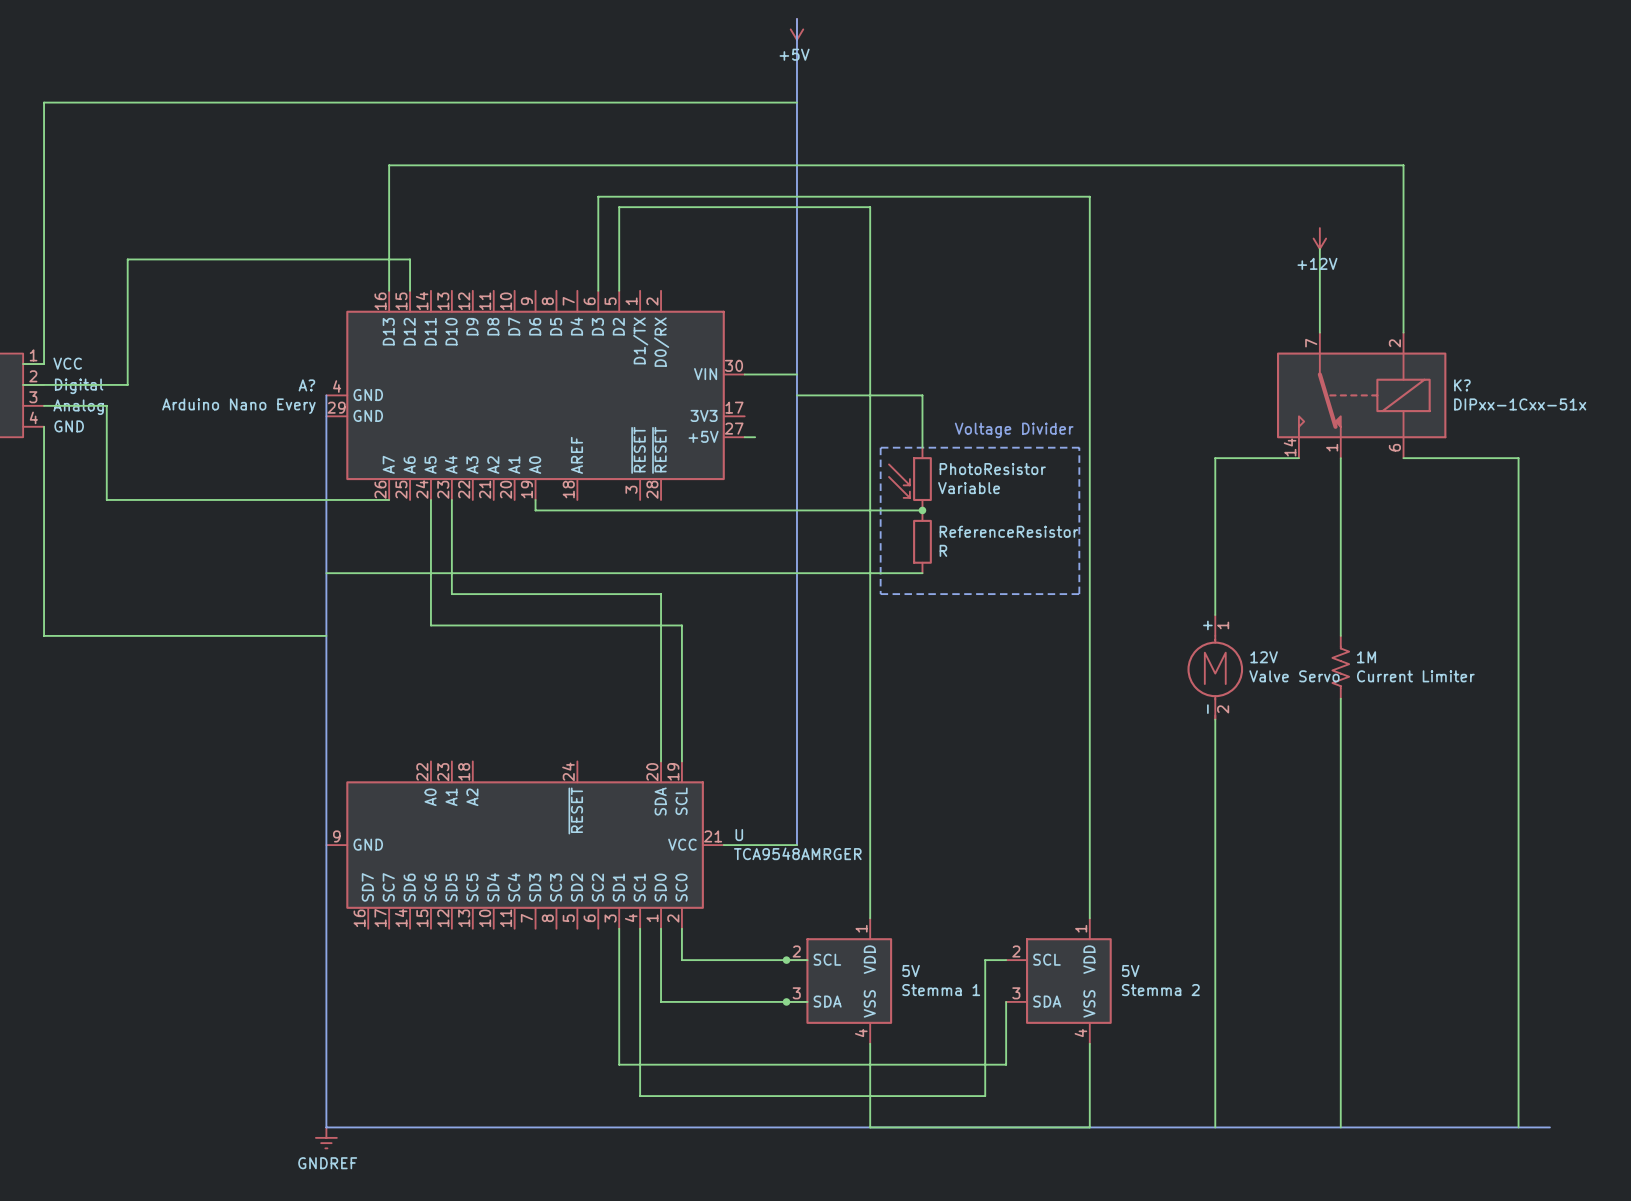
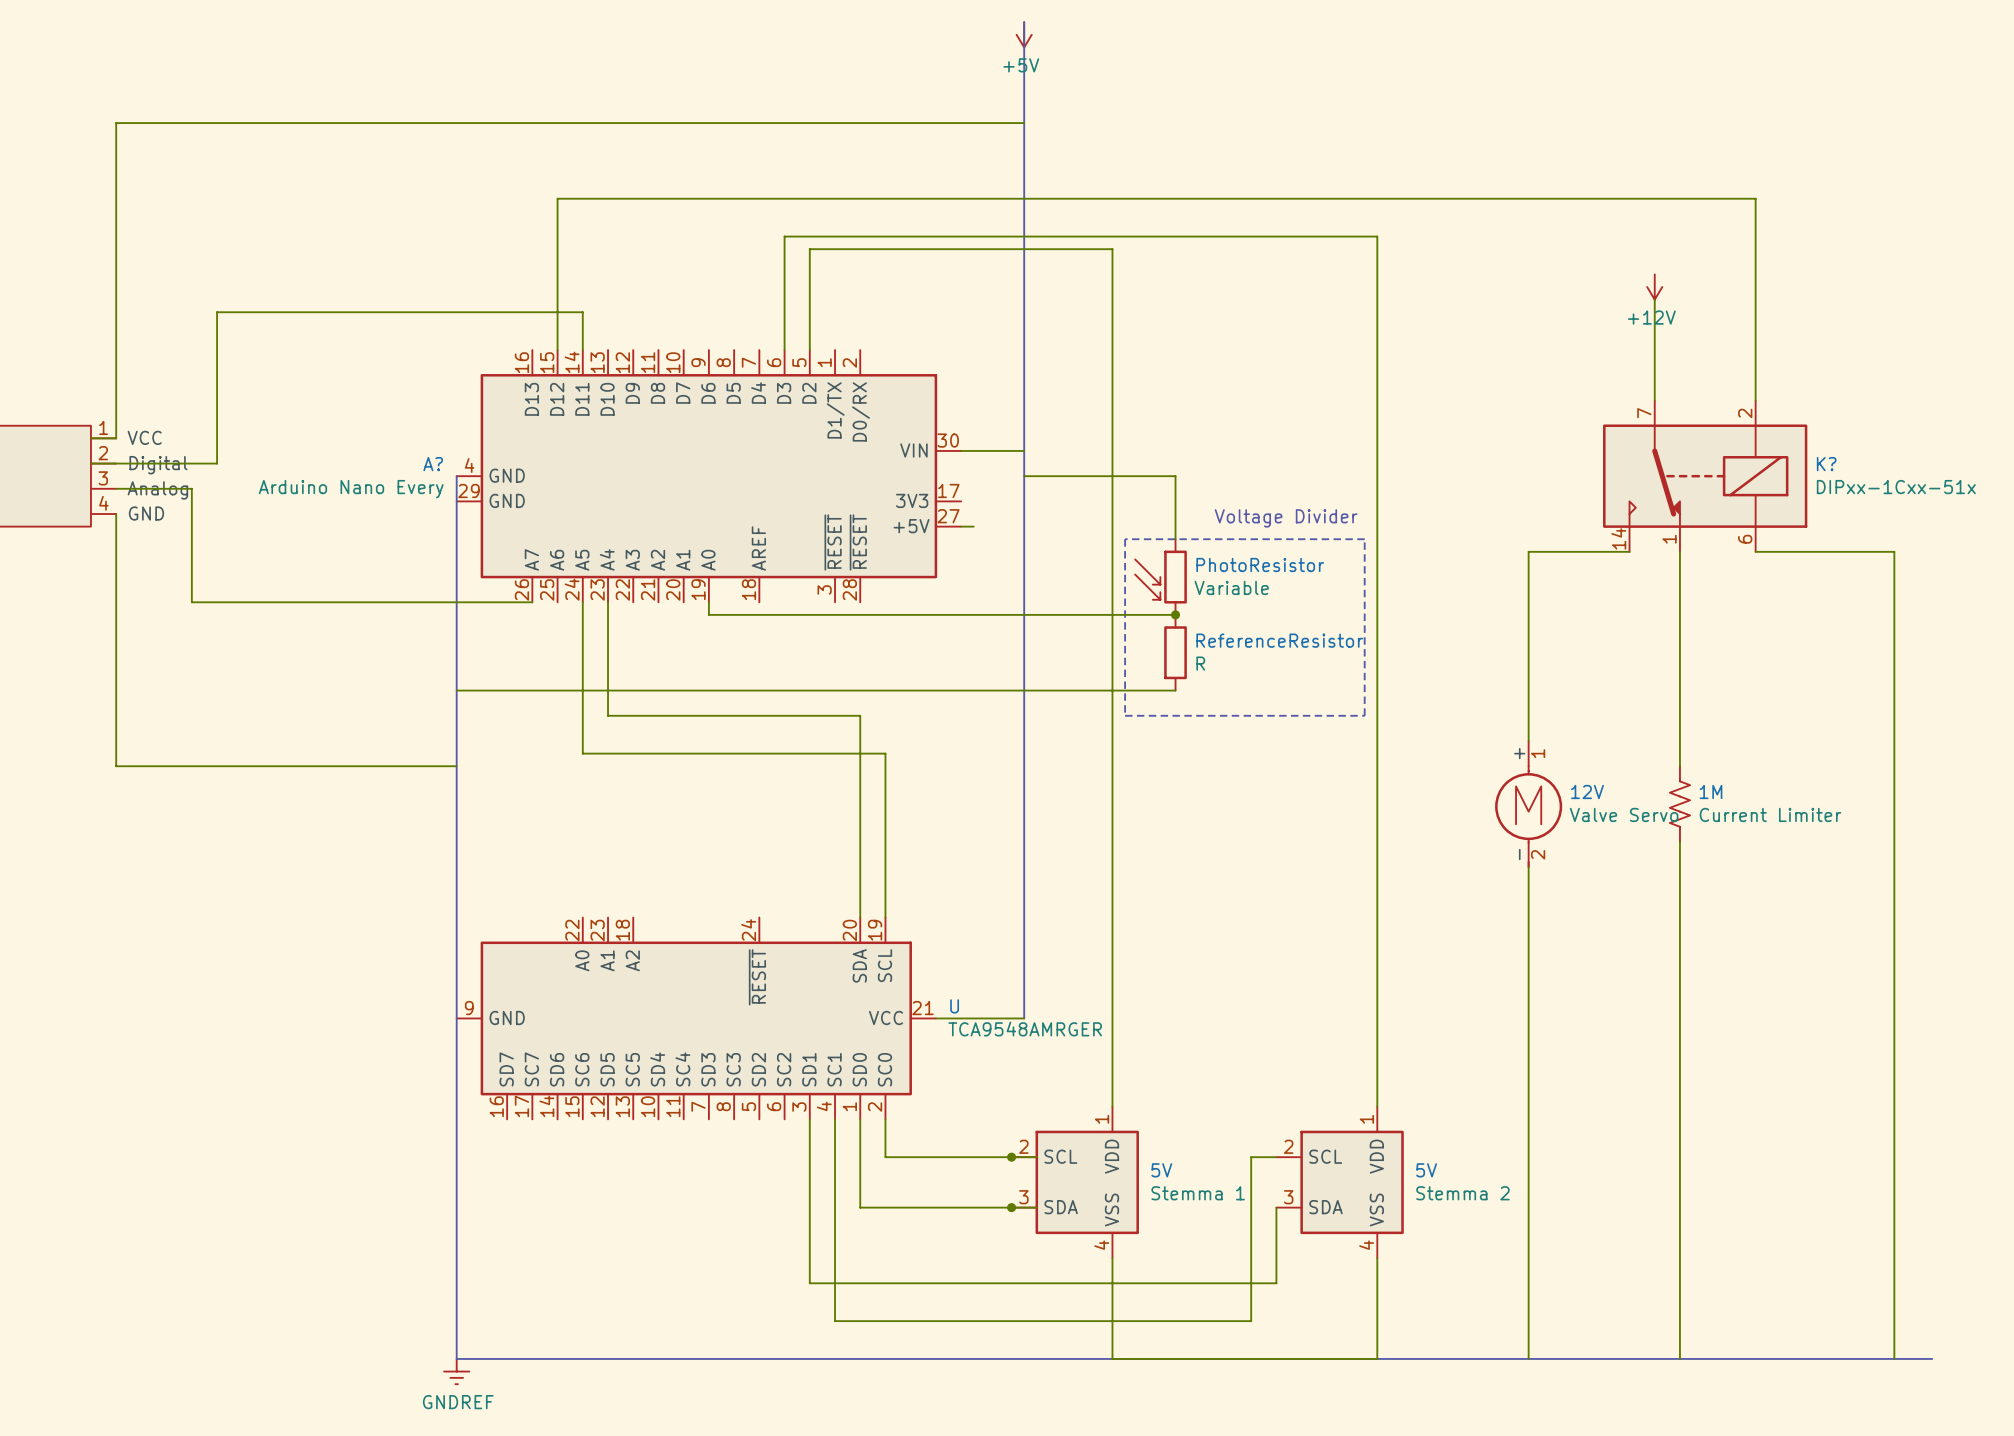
wire: (410, 165) (389, 165) (389, 290) -> (557, 198) (557, 312) (582, 312) (582, 350)

